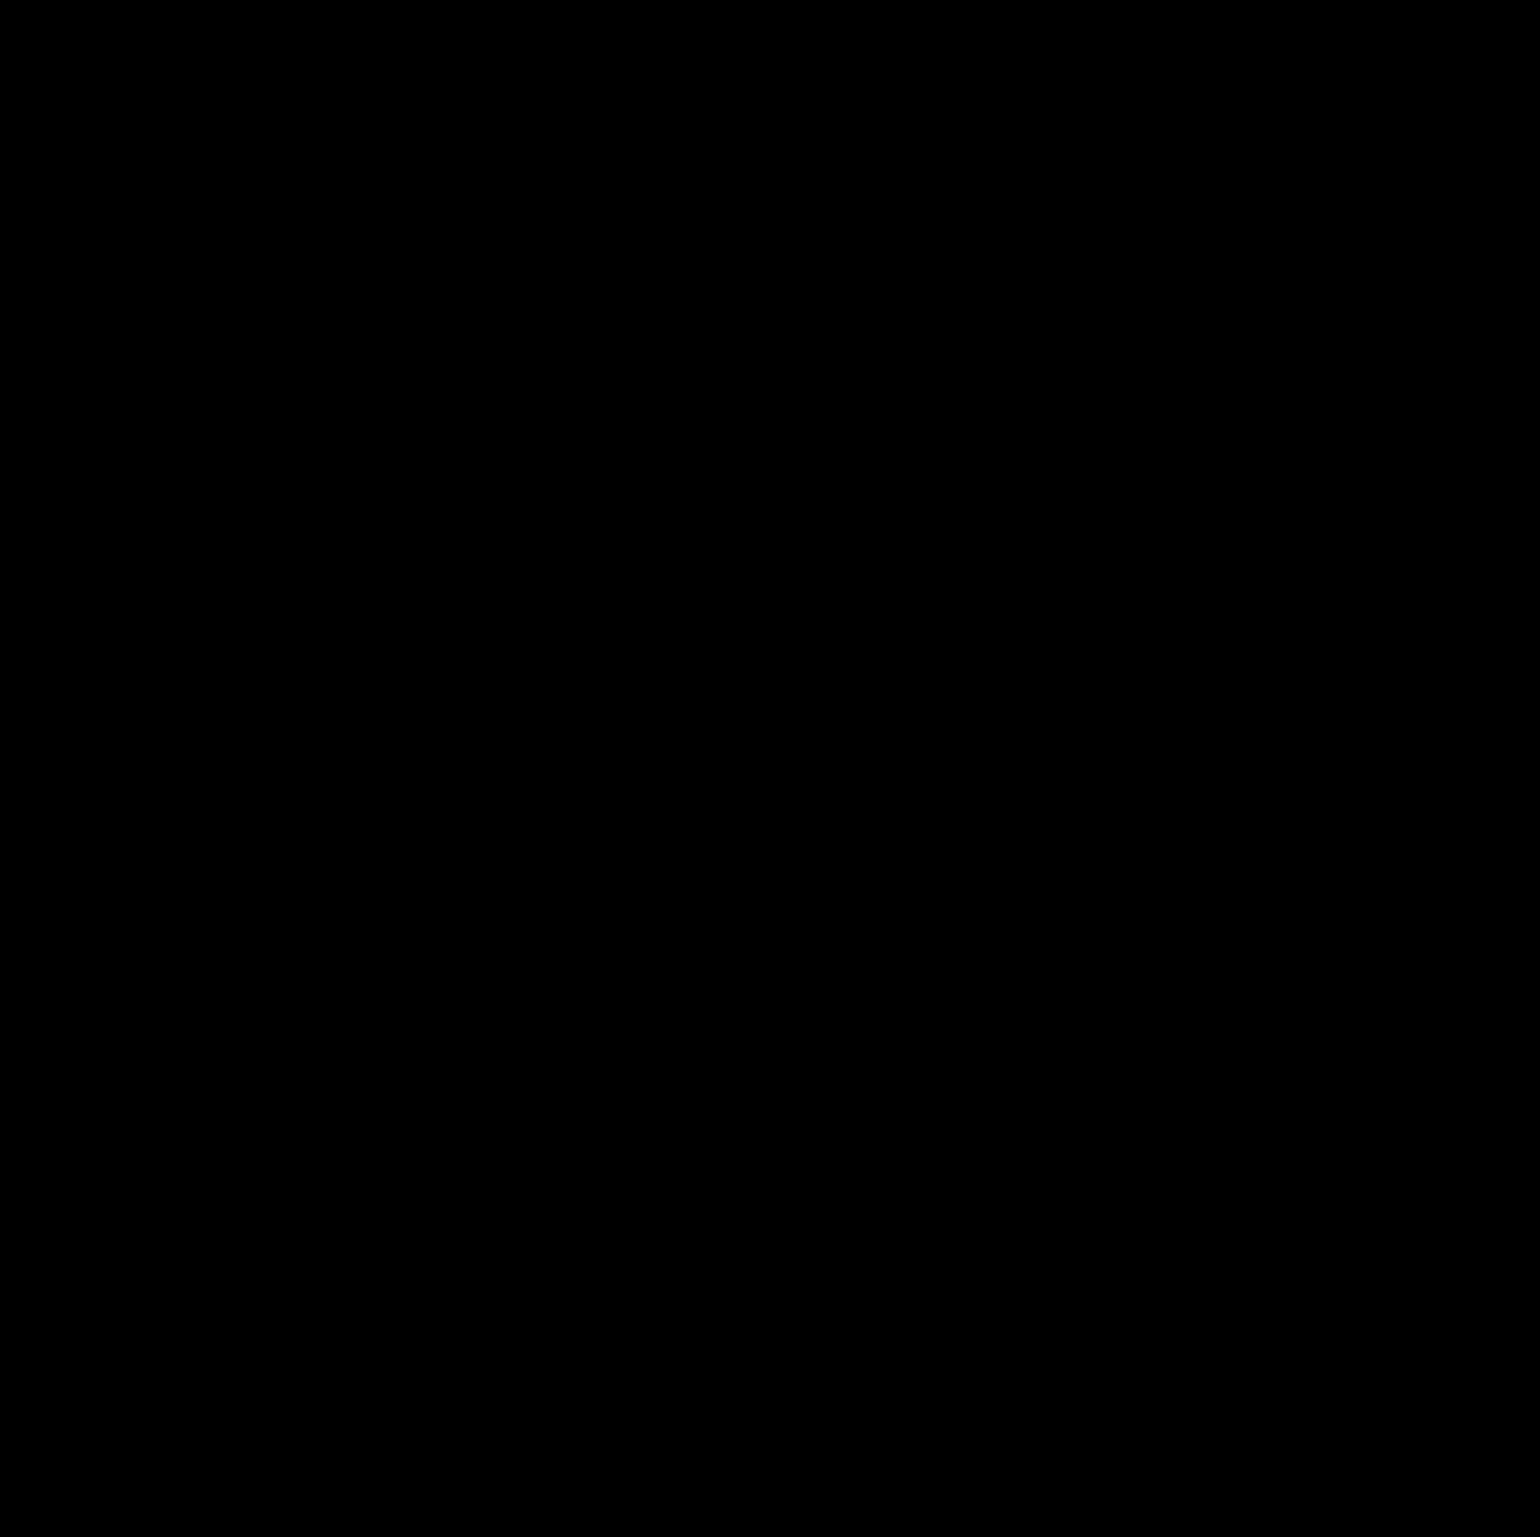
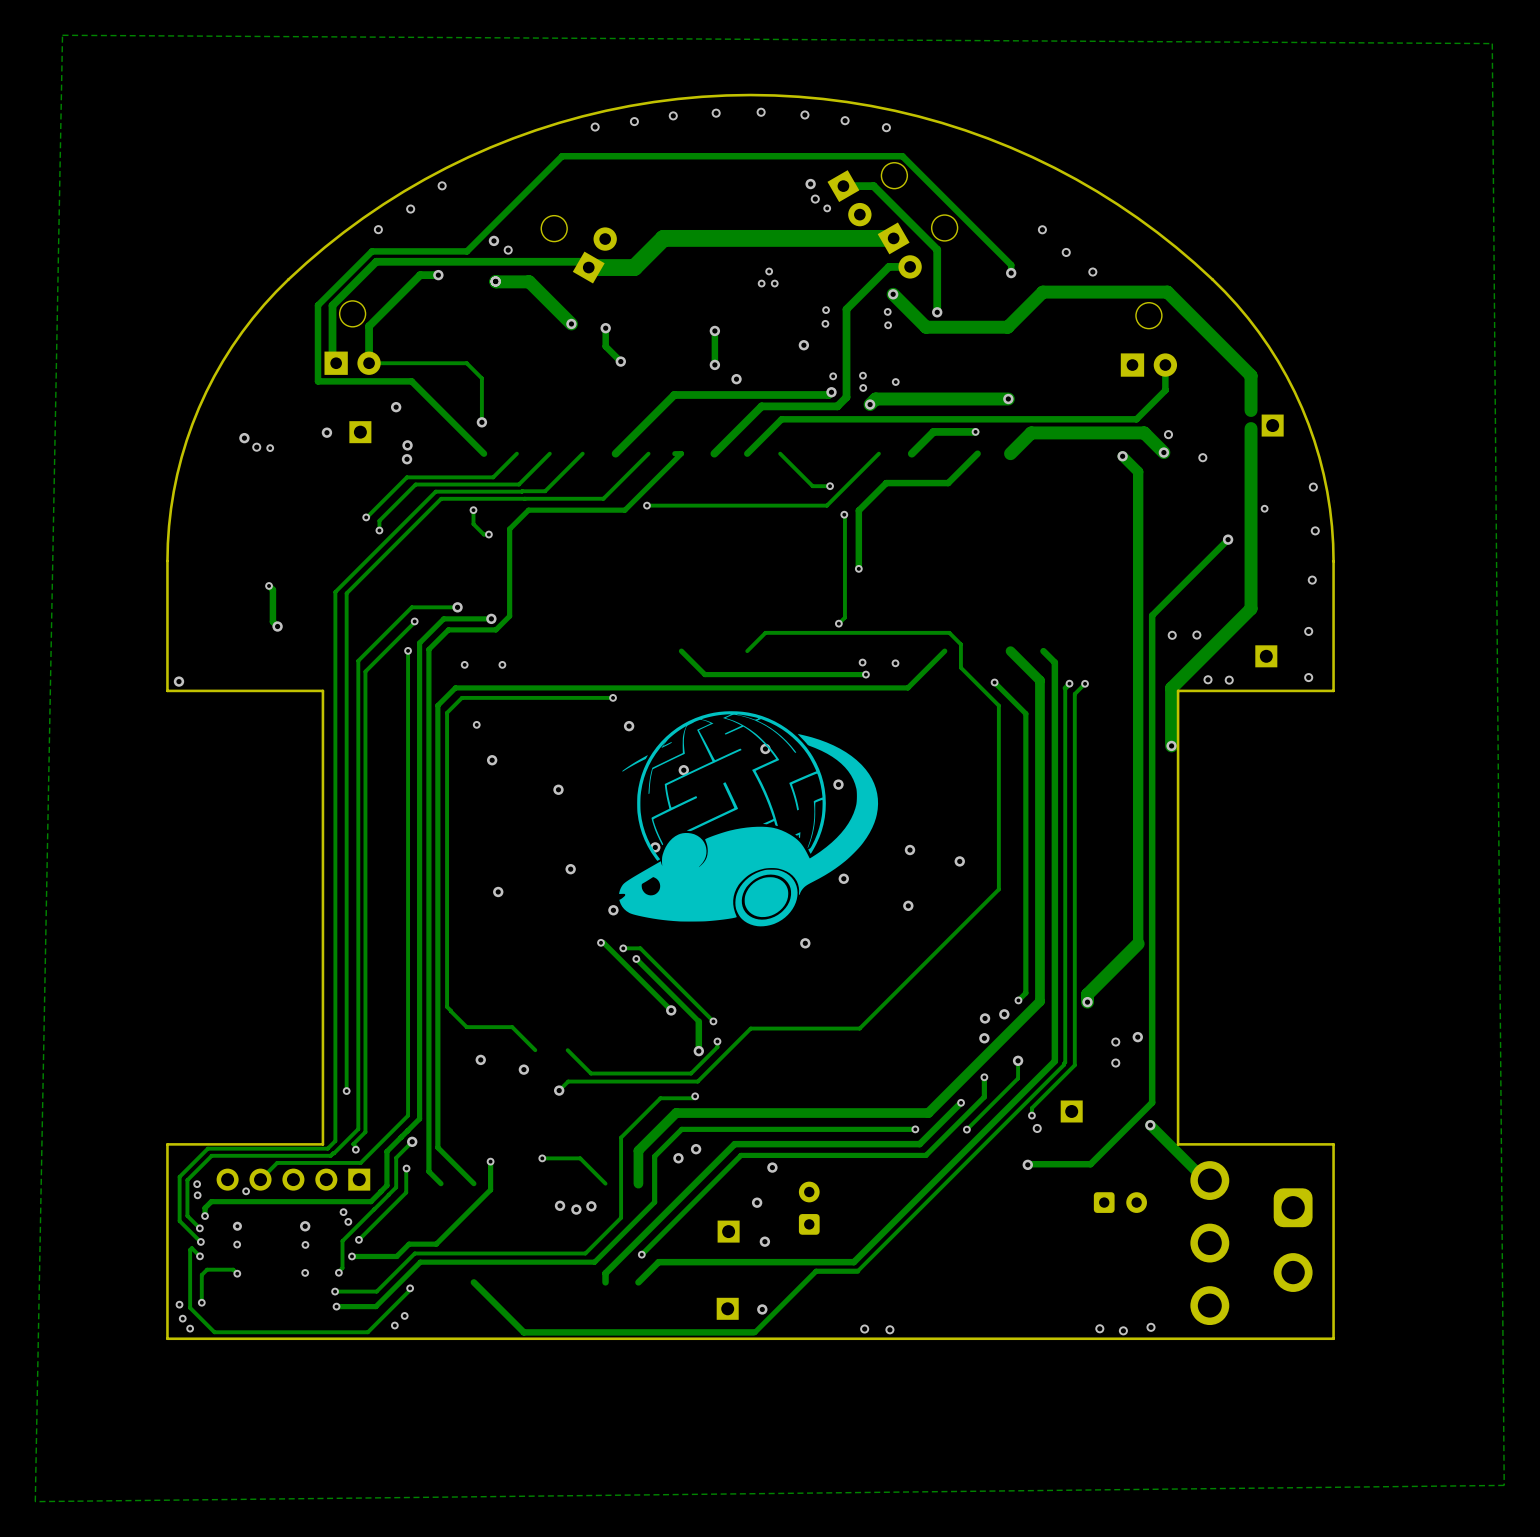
zone outline: none -> (62, 35) (35, 1501) (1504, 1485) (1492, 43) (62, 35)
via: none -> (761, 112)
via: none -> (716, 113)
via: none -> (804, 114)
via: none -> (673, 115)
via: none -> (845, 120)
via: none -> (634, 121)
via: none -> (595, 127)
via: none -> (886, 127)
via: none -> (810, 184)
via: none -> (442, 185)
track: none -> (843, 186) (873, 186) (937, 249) (937, 312)
part: none -> (867, 194)
via: none -> (815, 199)
via: none -> (827, 208)
via: none -> (410, 209)
via: none -> (378, 229)
via: none -> (1042, 229)
track: none -> (893, 238) (663, 238) (634, 267) (588, 267) (582, 261) (376, 261) (332, 305) (332, 359) (336, 363)
via: none -> (493, 240)
part: none -> (917, 246)
part: none -> (579, 249)
via: none -> (508, 250)
via: none -> (1066, 252)
track: none -> (910, 266) (888, 266) (846, 309) (846, 397) (837, 406) (761, 406) (714, 453)
via: none -> (769, 271)
via: none -> (1092, 272)
track: none -> (1011, 273) (1011, 264) (902, 156) (562, 156) (466, 251) (371, 251) (318, 305) (318, 381) (411, 381) (483, 453)
via: none -> (1011, 273)
track: none -> (438, 275) (420, 275) (369, 326) (369, 363) (466, 363) (481, 378) (481, 422)
via: none -> (438, 275)
board edge: none -> (1212, 279) (1157, 232) (1096, 191) (1054, 167) (987, 138) (941, 122) (871, 105) (799, 96) (750, 95) (702, 96) (629, 105) (559, 122) (490, 147) (425, 179) (383, 204) (324, 247) (276, 291) (252, 318) (222, 361) (199, 407) (181, 457) (173, 491) (167, 543) (167, 690) (322, 690) (322, 1144) (167, 1144) (167, 1338) (1333, 1338) (1333, 1144) (1178, 1144) (1178, 690) (1333, 690) (1333, 543) (1327, 491) (1319, 457) (1302, 408) (1278, 361) (1248, 318) (1212, 279)
track: none -> (495, 281) (529, 281) (571, 323)
via: none -> (495, 281)
via: none -> (761, 283)
via: none -> (774, 283)
track: none -> (893, 294) (926, 327) (1007, 327) (1042, 292) (1167, 292) (1251, 375) (1251, 410)
via: none -> (893, 294)
via: none -> (826, 310)
via: none -> (887, 311)
via: none -> (937, 312)
via: none -> (571, 323)
via: none -> (825, 323)
via: none -> (888, 325)
track: none -> (605, 328) (605, 346) (620, 361)
via: none -> (605, 328)
track: none -> (714, 330) (714, 364)
via: none -> (714, 330)
part: none -> (352, 337)
part: none -> (1148, 339)
via: none -> (803, 345)
via: none -> (620, 361)
via: none -> (714, 364)
track: none -> (1165, 365) (1165, 390) (1136, 419) (781, 419) (747, 453)
via: none -> (862, 375)
via: none -> (833, 376)
via: none -> (736, 379)
via: none -> (895, 382)
via: none -> (863, 387)
track: none -> (831, 392) (828, 394) (674, 394) (615, 453)
via: none -> (831, 392)
track: none -> (1008, 398) (875, 398) (870, 404)
via: none -> (1008, 398)
via: none -> (870, 404)
via: none -> (396, 407)
via: none -> (481, 422)
part: none -> (1272, 425)
track: none -> (1251, 428) (1251, 608) (1171, 688) (1171, 745)
track: none -> (975, 431) (933, 431) (911, 453)
via: none -> (975, 431)
via: none -> (326, 432)
part: none -> (360, 432)
via: none -> (1168, 434)
via: none -> (244, 438)
via: none -> (407, 445)
via: none -> (256, 447)
via: none -> (270, 448)
track: none -> (1163, 452) (1144, 432) (1031, 432) (1010, 453)
via: none -> (1163, 452)
track: none -> (516, 453) (493, 477) (406, 477) (366, 517)
track: none -> (549, 453) (518, 484) (415, 484) (379, 520) (379, 530)
track: none -> (582, 453) (545, 491) (435, 491) (335, 592) (335, 1141) (327, 1148) (207, 1148) (179, 1176) (179, 1220) (200, 1241)
track: none -> (648, 453) (603, 498) (441, 498) (346, 593) (346, 1091)
track: none -> (674, 453) (681, 453) (624, 510) (528, 510) (509, 529) (509, 616) (495, 629) (448, 629) (428, 649) (428, 1171) (440, 1183)
track: none -> (780, 453) (812, 486) (830, 486)
track: none -> (878, 453) (826, 505) (646, 505)
track: none -> (977, 453) (948, 483) (886, 483) (858, 510) (858, 568)
track: none -> (1122, 456) (1138, 471) (1138, 943) (1087, 994) (1087, 1002)
via: none -> (1122, 456)
via: none -> (1202, 457)
via: none -> (407, 459)
via: none -> (830, 486)
via: none -> (1313, 487)
via: none -> (646, 505)
via: none -> (1264, 508)
track: none -> (473, 510) (473, 524) (483, 534) (488, 534)
via: none -> (473, 510)
track: none -> (844, 514) (844, 617) (838, 623)
via: none -> (844, 514)
via: none -> (366, 517)
via: none -> (379, 530)
via: none -> (1315, 530)
via: none -> (488, 534)
track: none -> (1228, 539) (1152, 615) (1152, 1102) (1090, 1164) (1027, 1164)
via: none -> (1228, 539)
via: none -> (858, 568)
via: none -> (1312, 580)
track: none -> (269, 585) (272, 589) (272, 621) (277, 626)
via: none -> (269, 585)
track: none -> (457, 607) (411, 607) (358, 660) (358, 1129) (330, 1155) (211, 1155) (187, 1180) (187, 1215) (199, 1228)
via: none -> (457, 607)
track: none -> (491, 618) (443, 618) (419, 643) (419, 1118) (386, 1151) (386, 1185) (380, 1191)
via: none -> (491, 618)
track: none -> (414, 621) (365, 671) (365, 1132) (353, 1144) (355, 1149)
via: none -> (414, 621)
via: none -> (838, 623)
via: none -> (277, 626)
via: none -> (1308, 631)
via: none -> (1172, 635)
via: none -> (1196, 635)
track: none -> (408, 650) (408, 1115) (360, 1162) (277, 1162) (260, 1179)
via: none -> (408, 650)
track: none -> (681, 651) (704, 674) (865, 674)
track: none -> (747, 651) (765, 632) (949, 632) (960, 644) (960, 667) (998, 705) (998, 889) (859, 1028) (750, 1028) (697, 1081) (568, 1081) (559, 1090)
track: none -> (944, 651) (907, 687) (455, 687) (437, 705) (437, 1147) (473, 1183)
track: none -> (1010, 651) (1039, 680) (1039, 1001) (928, 1113) (676, 1113) (638, 1150) (638, 1183)
track: none -> (1043, 651) (1054, 662) (1054, 1061) (853, 1262) (658, 1262) (638, 1282)
part: none -> (1266, 656)
via: none -> (862, 662)
via: none -> (895, 663)
via: none -> (464, 664)
via: none -> (502, 664)
via: none -> (865, 674)
via: none -> (1308, 677)
via: none -> (1208, 679)
via: none -> (1229, 680)
via: none -> (178, 681)
track: none -> (994, 682) (1025, 713) (1025, 993) (1018, 1000)
via: none -> (994, 682)
track: none -> (1069, 683) (1065, 688) (1063, 1064) (857, 1271) (816, 1271) (754, 1332) (523, 1332) (473, 1282)
via: none -> (1069, 683)
track: none -> (1085, 683) (1074, 694) (1074, 1065) (1031, 1108) (1031, 1115)
via: none -> (1085, 683)
track: none -> (613, 697) (461, 697) (447, 712) (447, 1006) (466, 1027) (512, 1027) (535, 1050)
via: none -> (613, 697)
drawing: none -> [619, 711, 879, 927]
via: none -> (476, 724)
via: none -> (629, 726)
via: none -> (1171, 745)
via: none -> (765, 748)
via: none -> (492, 760)
via: none -> (683, 770)
via: none -> (838, 784)
via: none -> (558, 789)
via: none -> (655, 847)
via: none -> (910, 850)
via: none -> (959, 861)
via: none -> (570, 869)
via: none -> (843, 878)
via: none -> (498, 891)
via: none -> (908, 905)
via: none -> (613, 910)
track: none -> (600, 942) (603, 942) (671, 1010)
via: none -> (600, 942)
via: none -> (805, 943)
track: none -> (623, 948) (640, 948) (713, 1021)
via: none -> (623, 948)
track: none -> (636, 958) (698, 1021) (698, 1051)
via: none -> (636, 958)
via: none -> (1018, 1000)
via: none -> (1087, 1002)
via: none -> (671, 1010)
via: none -> (1004, 1014)
via: none -> (985, 1018)
via: none -> (713, 1021)
via: none -> (1137, 1037)
via: none -> (984, 1038)
track: none -> (717, 1041) (717, 1047) (691, 1073) (591, 1073) (567, 1050)
via: none -> (717, 1041)
via: none -> (1115, 1042)
via: none -> (698, 1051)
via: none -> (480, 1059)
track: none -> (1018, 1060) (1018, 1078) (966, 1129)
via: none -> (1018, 1060)
via: none -> (1115, 1063)
via: none -> (523, 1069)
track: none -> (984, 1077) (984, 1096) (925, 1155) (741, 1155) (641, 1254)
via: none -> (984, 1077)
via: none -> (559, 1090)
via: none -> (346, 1091)
track: none -> (695, 1096) (693, 1098) (660, 1098) (621, 1137) (621, 1217) (585, 1253) (414, 1253) (376, 1291) (335, 1291)
via: none -> (695, 1096)
track: none -> (961, 1102) (919, 1144) (734, 1144) (605, 1273) (605, 1282)
via: none -> (961, 1102)
part: none -> (1071, 1111)
via: none -> (1031, 1115)
track: none -> (1150, 1125) (1205, 1180) (1209, 1180)
via: none -> (1150, 1125)
via: none -> (1037, 1128)
track: none -> (915, 1129) (681, 1129) (654, 1156) (654, 1202) (594, 1262) (420, 1262) (375, 1306) (336, 1306)
via: none -> (915, 1129)
via: none -> (966, 1129)
track: none -> (412, 1141) (396, 1157) (396, 1187) (388, 1194)
via: none -> (412, 1141)
via: none -> (355, 1149)
via: none -> (696, 1149)
track: none -> (542, 1158) (580, 1158) (605, 1183)
via: none -> (542, 1158)
via: none -> (678, 1158)
track: none -> (490, 1161) (490, 1189) (436, 1244) (409, 1244) (396, 1256) (351, 1256)
via: none -> (490, 1161)
via: none -> (1027, 1164)
via: none -> (772, 1167)
track: none -> (406, 1168) (406, 1192) (358, 1239)
via: none -> (406, 1168)
part: none -> (293, 1179)
via: none -> (197, 1184)
via: none -> (246, 1191)
track: none -> (380, 1191) (371, 1201) (211, 1201) (205, 1208) (205, 1216)
track: none -> (388, 1194) (374, 1209)
via: none -> (197, 1195)
via: none -> (757, 1202)
part: none -> (1120, 1202)
via: none -> (560, 1205)
via: none -> (591, 1206)
part: none -> (809, 1208)
track: none -> (374, 1209) (342, 1241) (342, 1268) (338, 1272)
via: none -> (576, 1209)
via: none -> (343, 1212)
via: none -> (205, 1216)
via: none -> (348, 1221)
via: none -> (237, 1226)
via: none -> (305, 1226)
via: none -> (199, 1228)
part: none -> (728, 1231)
via: none -> (358, 1239)
part: none -> (1293, 1240)
via: none -> (200, 1241)
via: none -> (764, 1241)
part: none -> (1209, 1243)
via: none -> (237, 1244)
via: none -> (305, 1244)
via: none -> (641, 1254)
track: none -> (199, 1256) (191, 1248) (190, 1249) (190, 1307) (214, 1332) (367, 1332) (410, 1288)
via: none -> (199, 1256)
via: none -> (351, 1256)
via: none -> (305, 1272)
via: none -> (338, 1272)
track: none -> (237, 1273) (233, 1269) (207, 1269) (201, 1274) (201, 1302)
via: none -> (237, 1273)
via: none -> (410, 1288)
via: none -> (335, 1291)
via: none -> (201, 1302)
via: none -> (179, 1304)
via: none -> (336, 1306)
part: none -> (727, 1308)
via: none -> (762, 1309)
via: none -> (404, 1315)
via: none -> (182, 1318)
via: none -> (394, 1325)
via: none -> (1151, 1327)
via: none -> (190, 1328)
via: none -> (1099, 1328)
via: none -> (864, 1329)
via: none -> (889, 1329)
via: none -> (1123, 1330)

